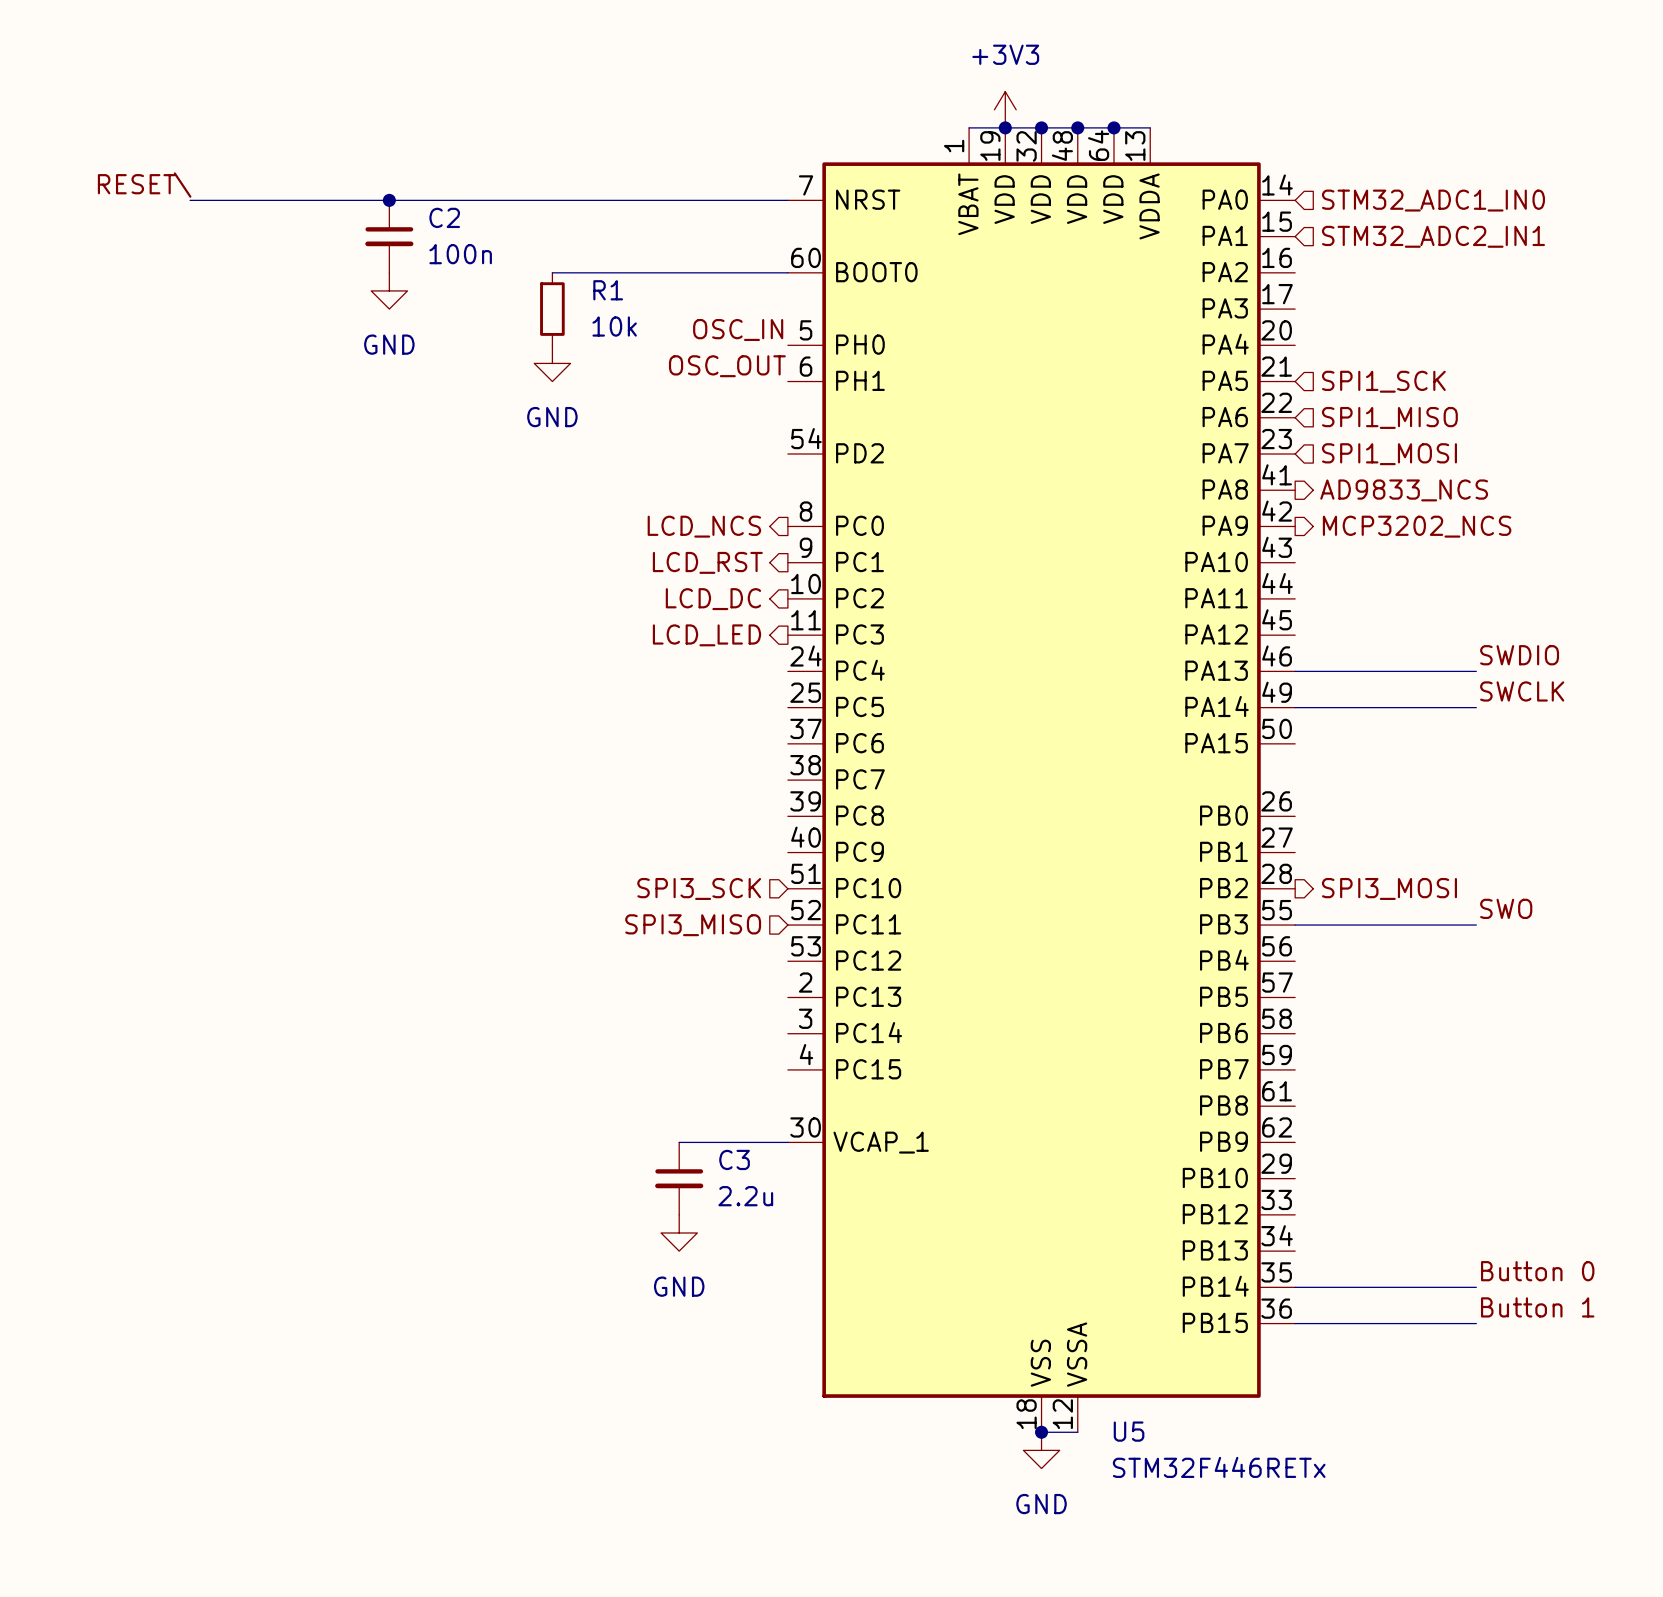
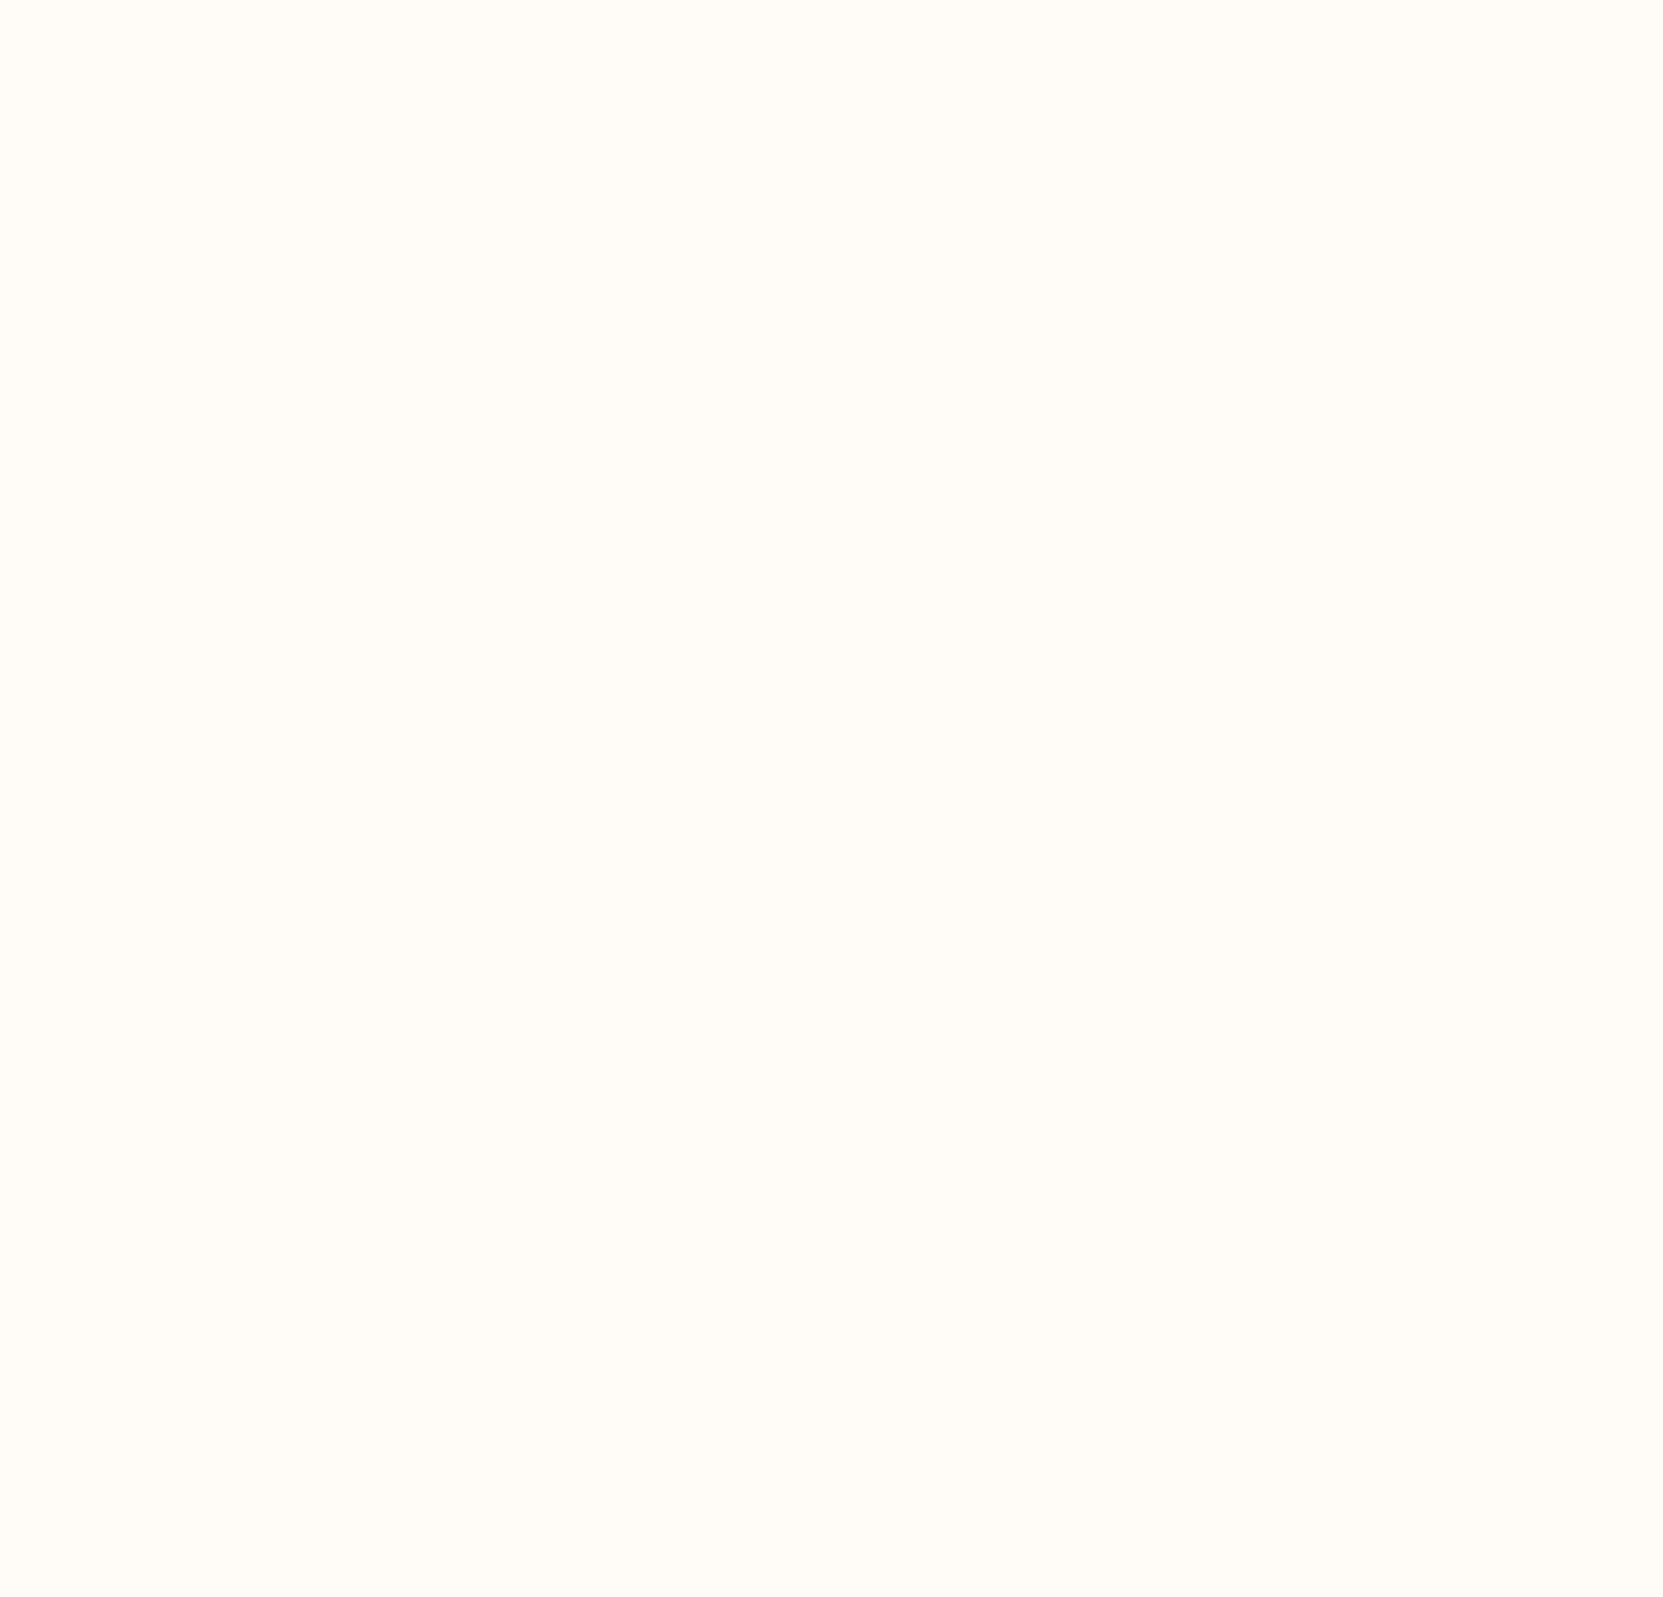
power symbol: +3V3 (1005, 109) -> none
wire: (969, 127) (1150, 127) -> none
junction: (1005, 127) -> none
junction: (1041, 127) -> none
junction: (1077, 127) -> none
junction: (1114, 127) -> none
label: RESET\ (144, 185) -> none
wire: (190, 200) (787, 200) -> none
junction: (389, 200) -> none
hierarchical label: STM32_ADC1_IN0 (1433, 200) -> none
C2: 100n (389, 236) -> none
hierarchical label: STM32_ADC2_IN1 (1433, 236) -> none
wire: (552, 272) (787, 272) -> none
power symbol: GND (389, 290) -> none
R1: 10k (552, 309) -> none
label: OSC_IN (738, 330) -> none
power symbol: GND (552, 363) -> none
label: OSC_OUT (727, 366) -> none
hierarchical label: SPI1_SCK (1383, 381) -> none
hierarchical label: SPI1_MISO (1389, 417) -> none
hierarchical label: SPI1_MOSI (1389, 454) -> none
hierarchical label: AD9833_NCS (1404, 490) -> none
hierarchical label: LCD_NCS (704, 526) -> none
hierarchical label: MCP3202_NCS (1417, 526) -> none
hierarchical label: LCD_RST (707, 562) -> none
hierarchical label: LCD_DC (713, 599) -> none
hierarchical label: LCD_LED (706, 635) -> none
label: SWDIO (1519, 655) -> none
wire: (1295, 671) (1476, 671) -> none
label: SWCLK (1522, 691) -> none
wire: (1295, 707) (1476, 707) -> none
U5: STM32F446RETx (1041, 780) -> none
hierarchical label: SPI3_SCK (699, 888) -> none
hierarchical label: SPI3_MOSI (1389, 888) -> none
label: SWO (1506, 908) -> none
hierarchical label: SPI3_MISO (693, 925) -> none
wire: (1295, 925) (1476, 925) -> none
wire: (679, 1142) (787, 1142) -> none
C3: 2.2u (679, 1178) -> none
power symbol: GND (679, 1232) -> none
label: Button 0 (1537, 1271) -> none
wire: (1295, 1287) (1476, 1287) -> none
label: Button 1 (1537, 1307) -> none
wire: (1295, 1323) (1476, 1323) -> none
wire: (1041, 1432) (1077, 1432) -> none
junction: (1041, 1432) -> none
power symbol: GND (1041, 1450) -> none

